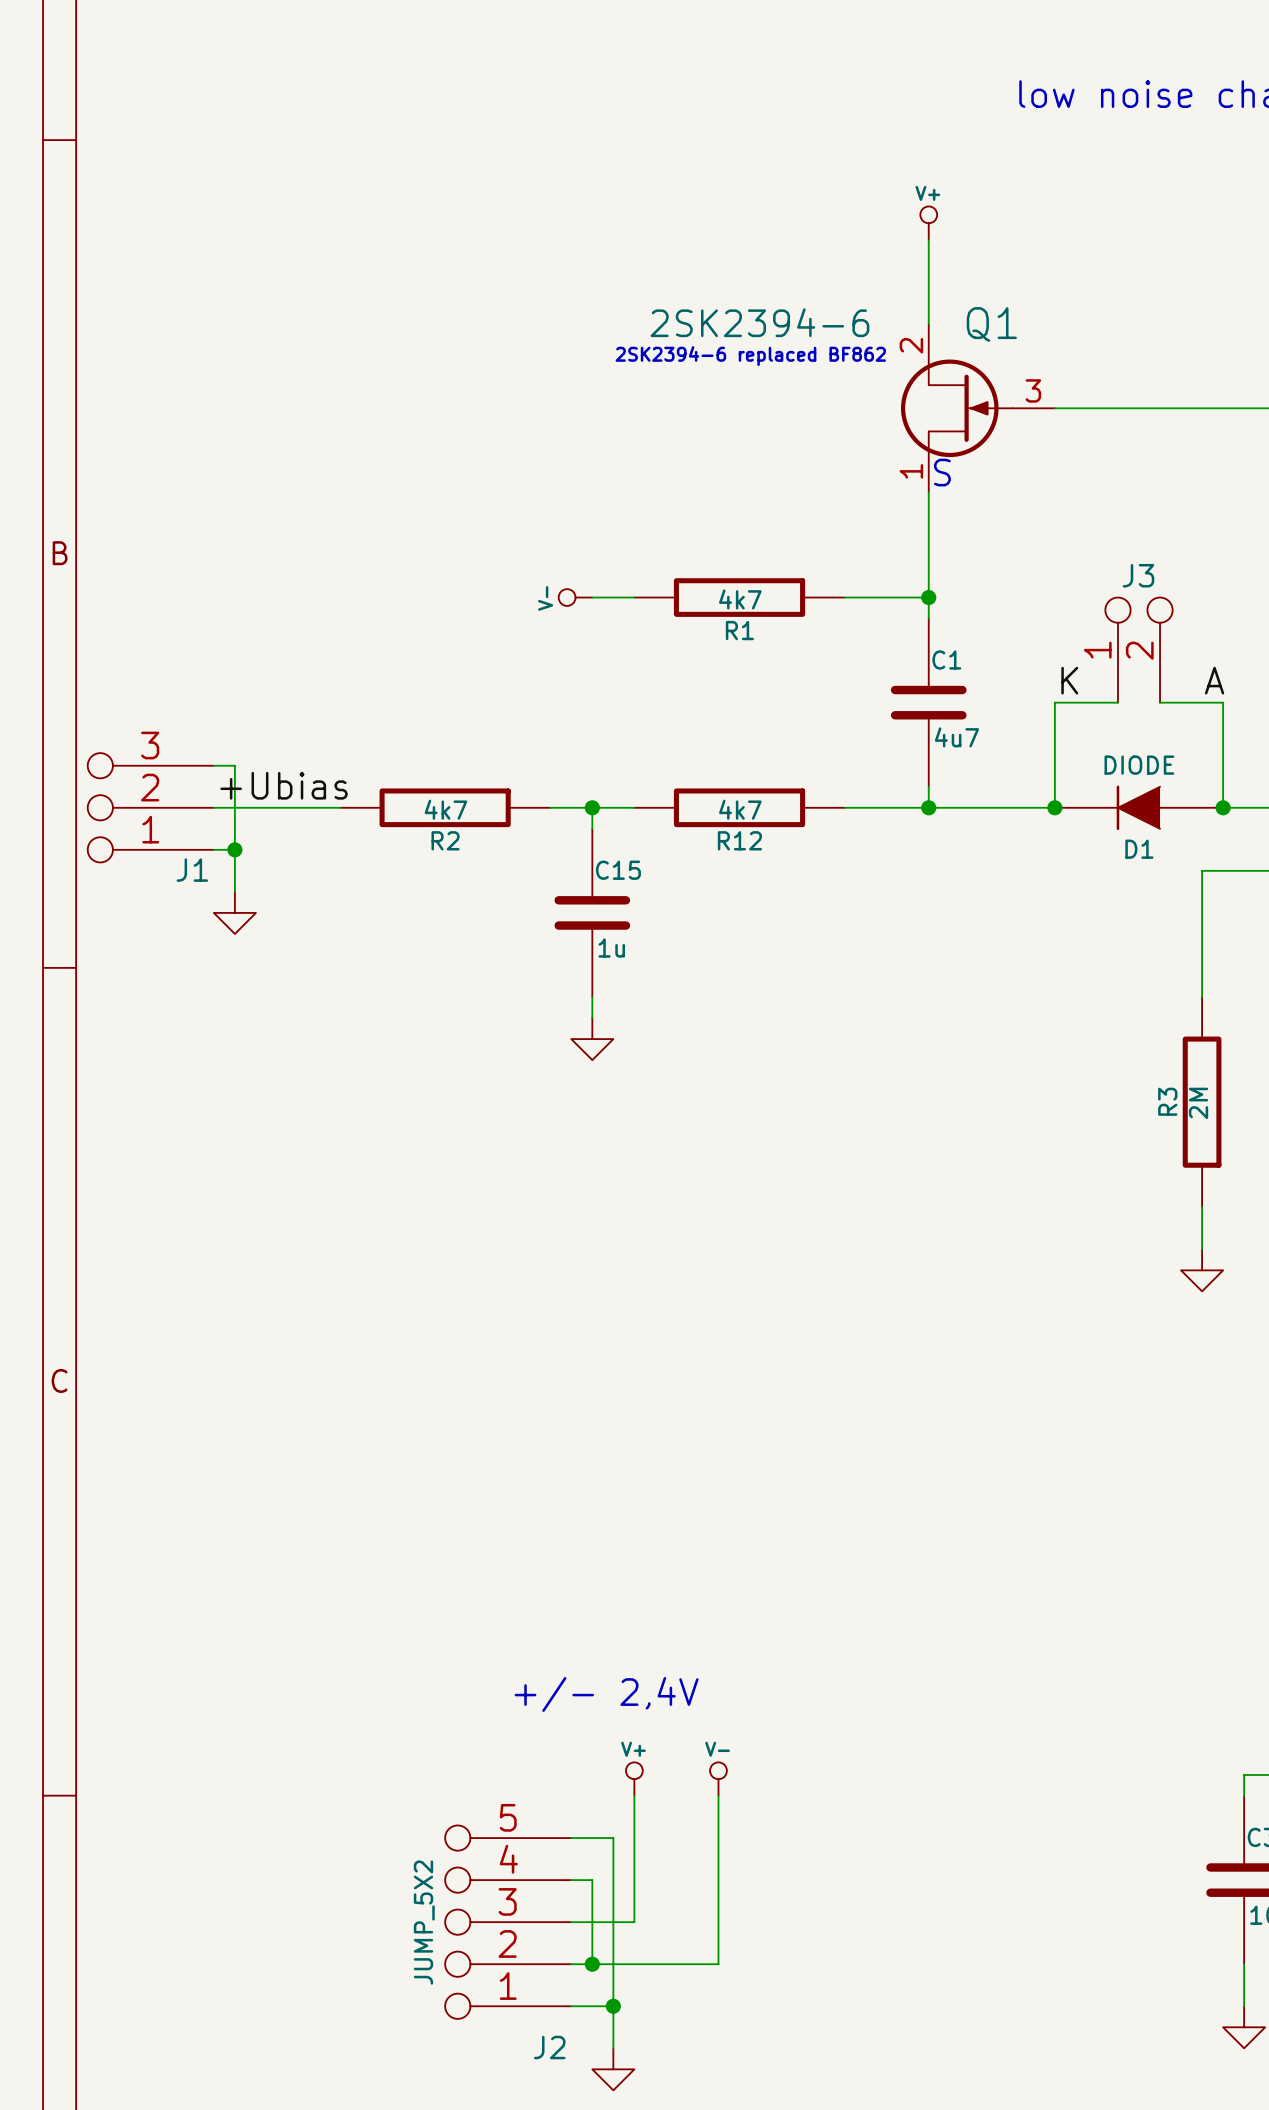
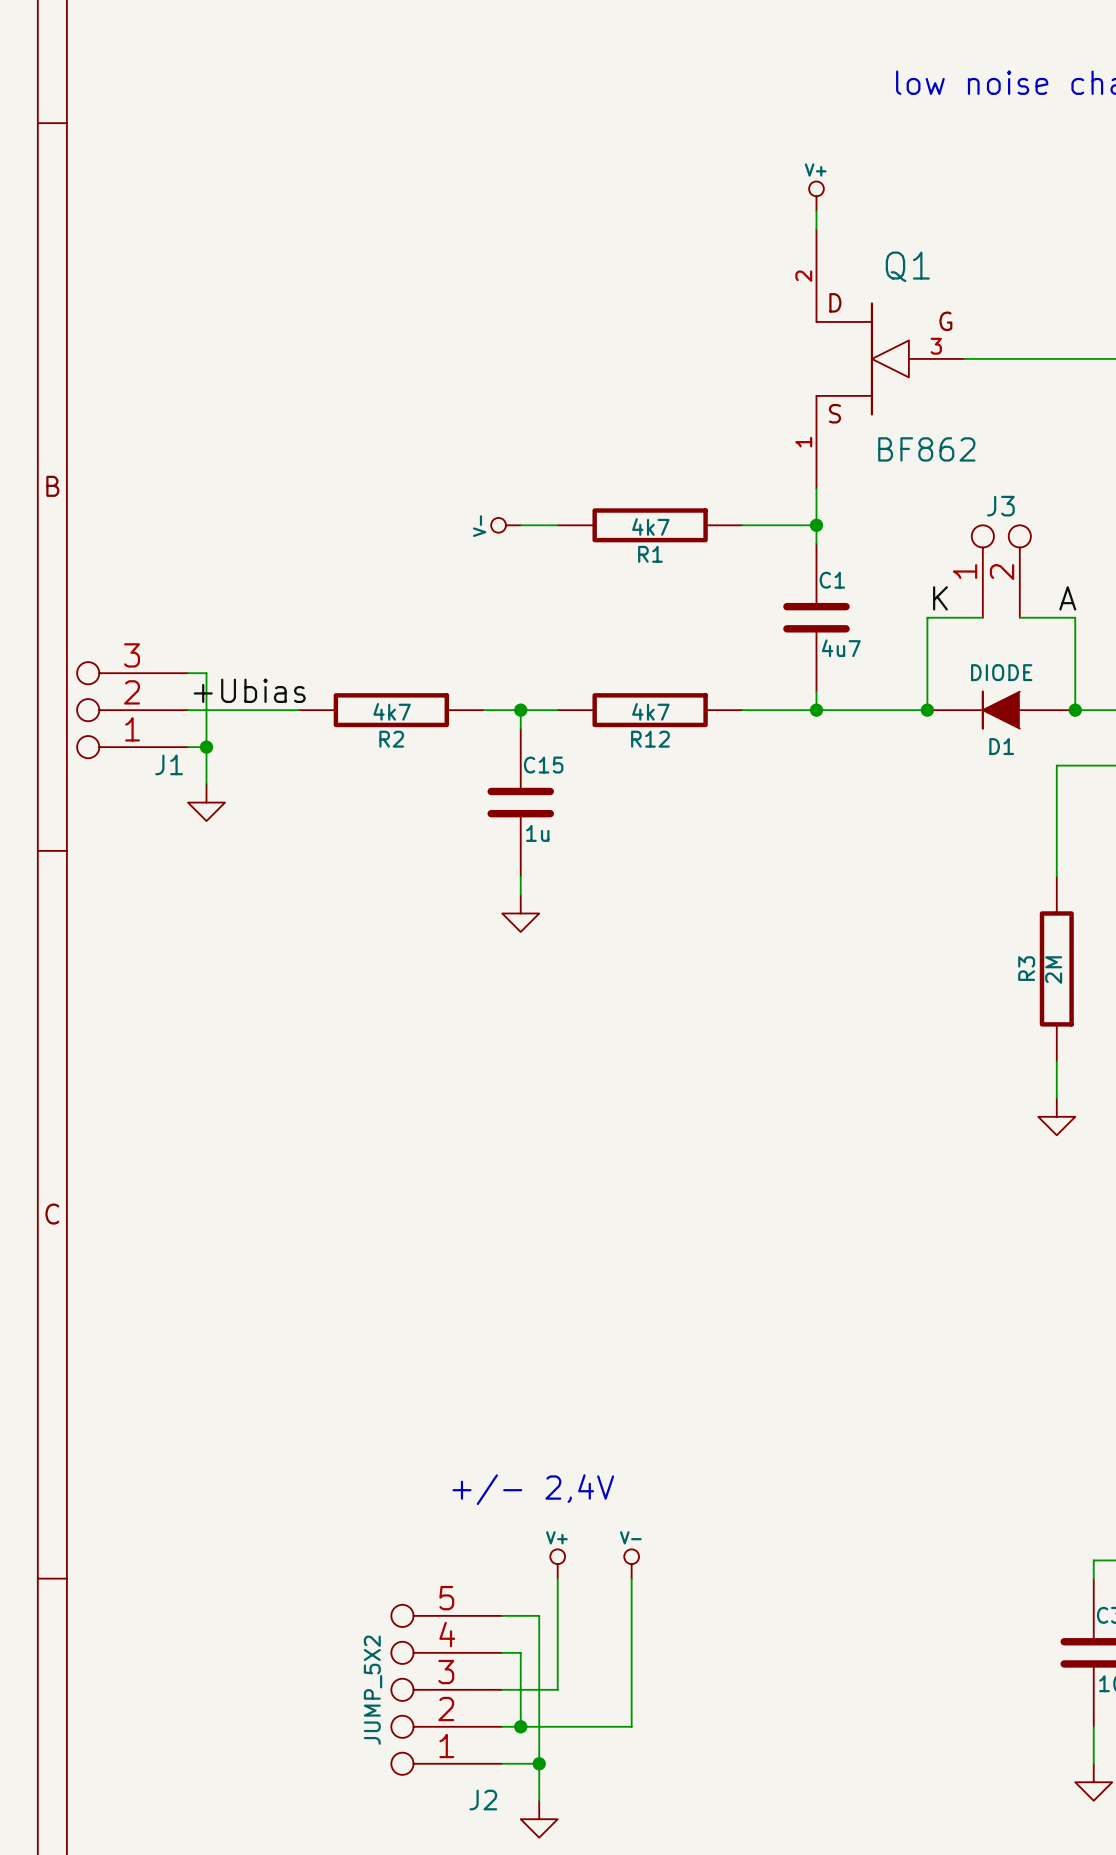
Q1 value: 2SK2394-6 (759, 322) -> BF862 (926, 449)
Q1 symbol: [900, 324, 1055, 493] -> [816, 229, 965, 489]
text: 2SK2394-6 replaced BF862 (750, 356) -> none
text: S (942, 472) -> none

